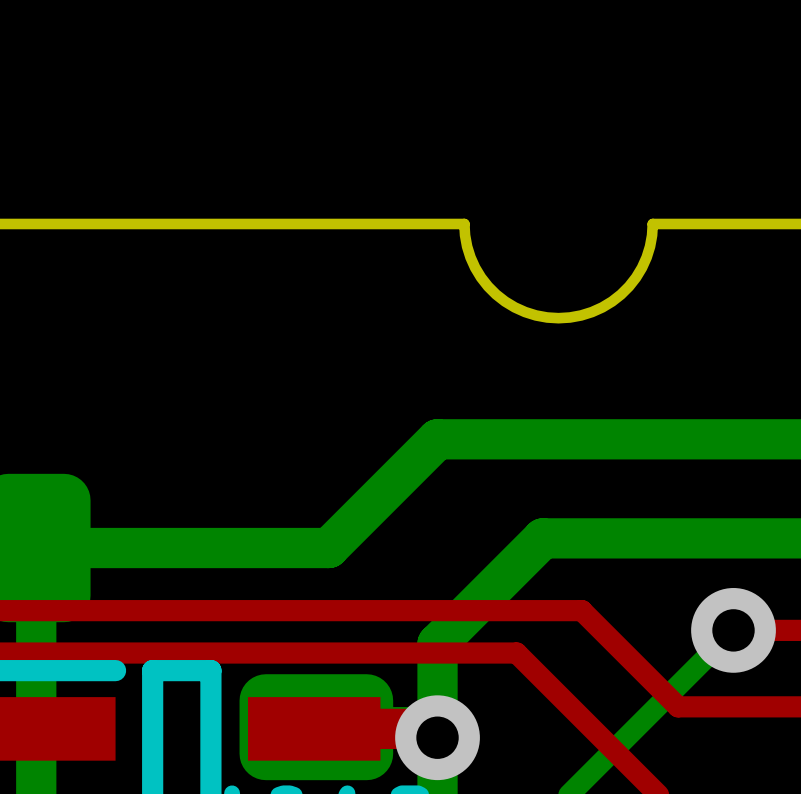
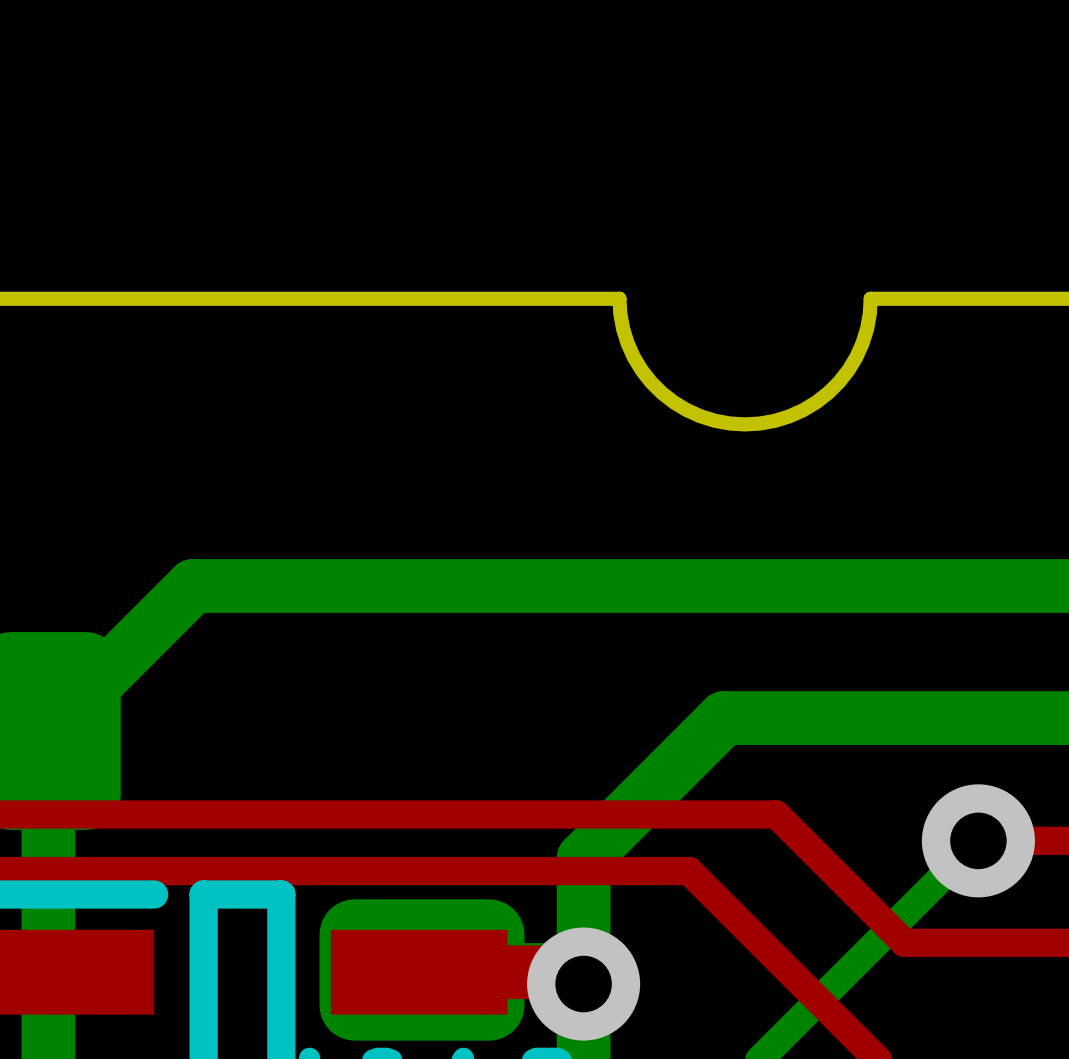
bottom track: (437, 439) (328, 548) (36, 548) -> (583, 585) (193, 585) (48, 730)

